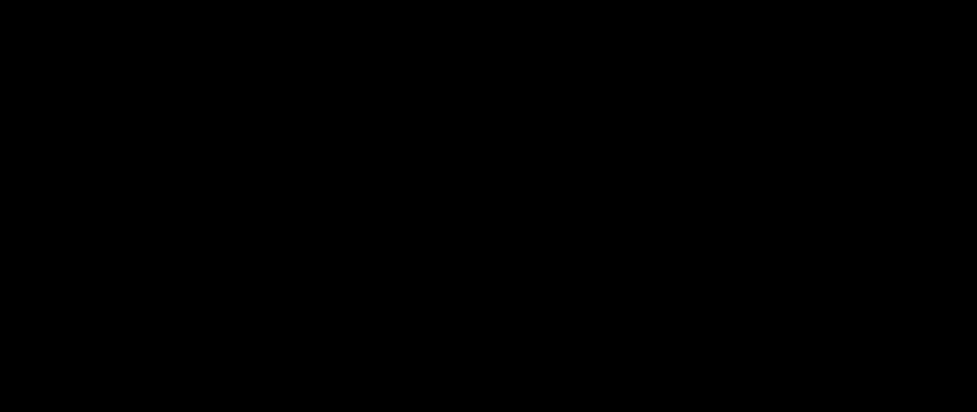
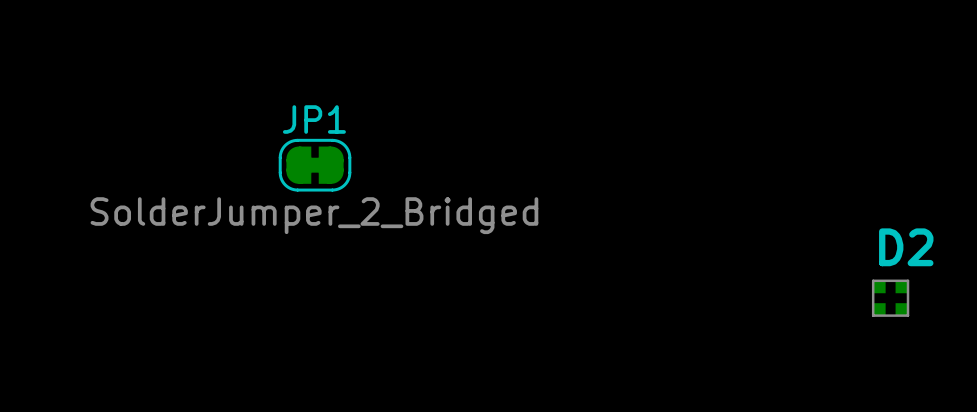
JP1: none -> SolderJumper_2_Bridged (315, 165)
D2: none -> (889, 296)

